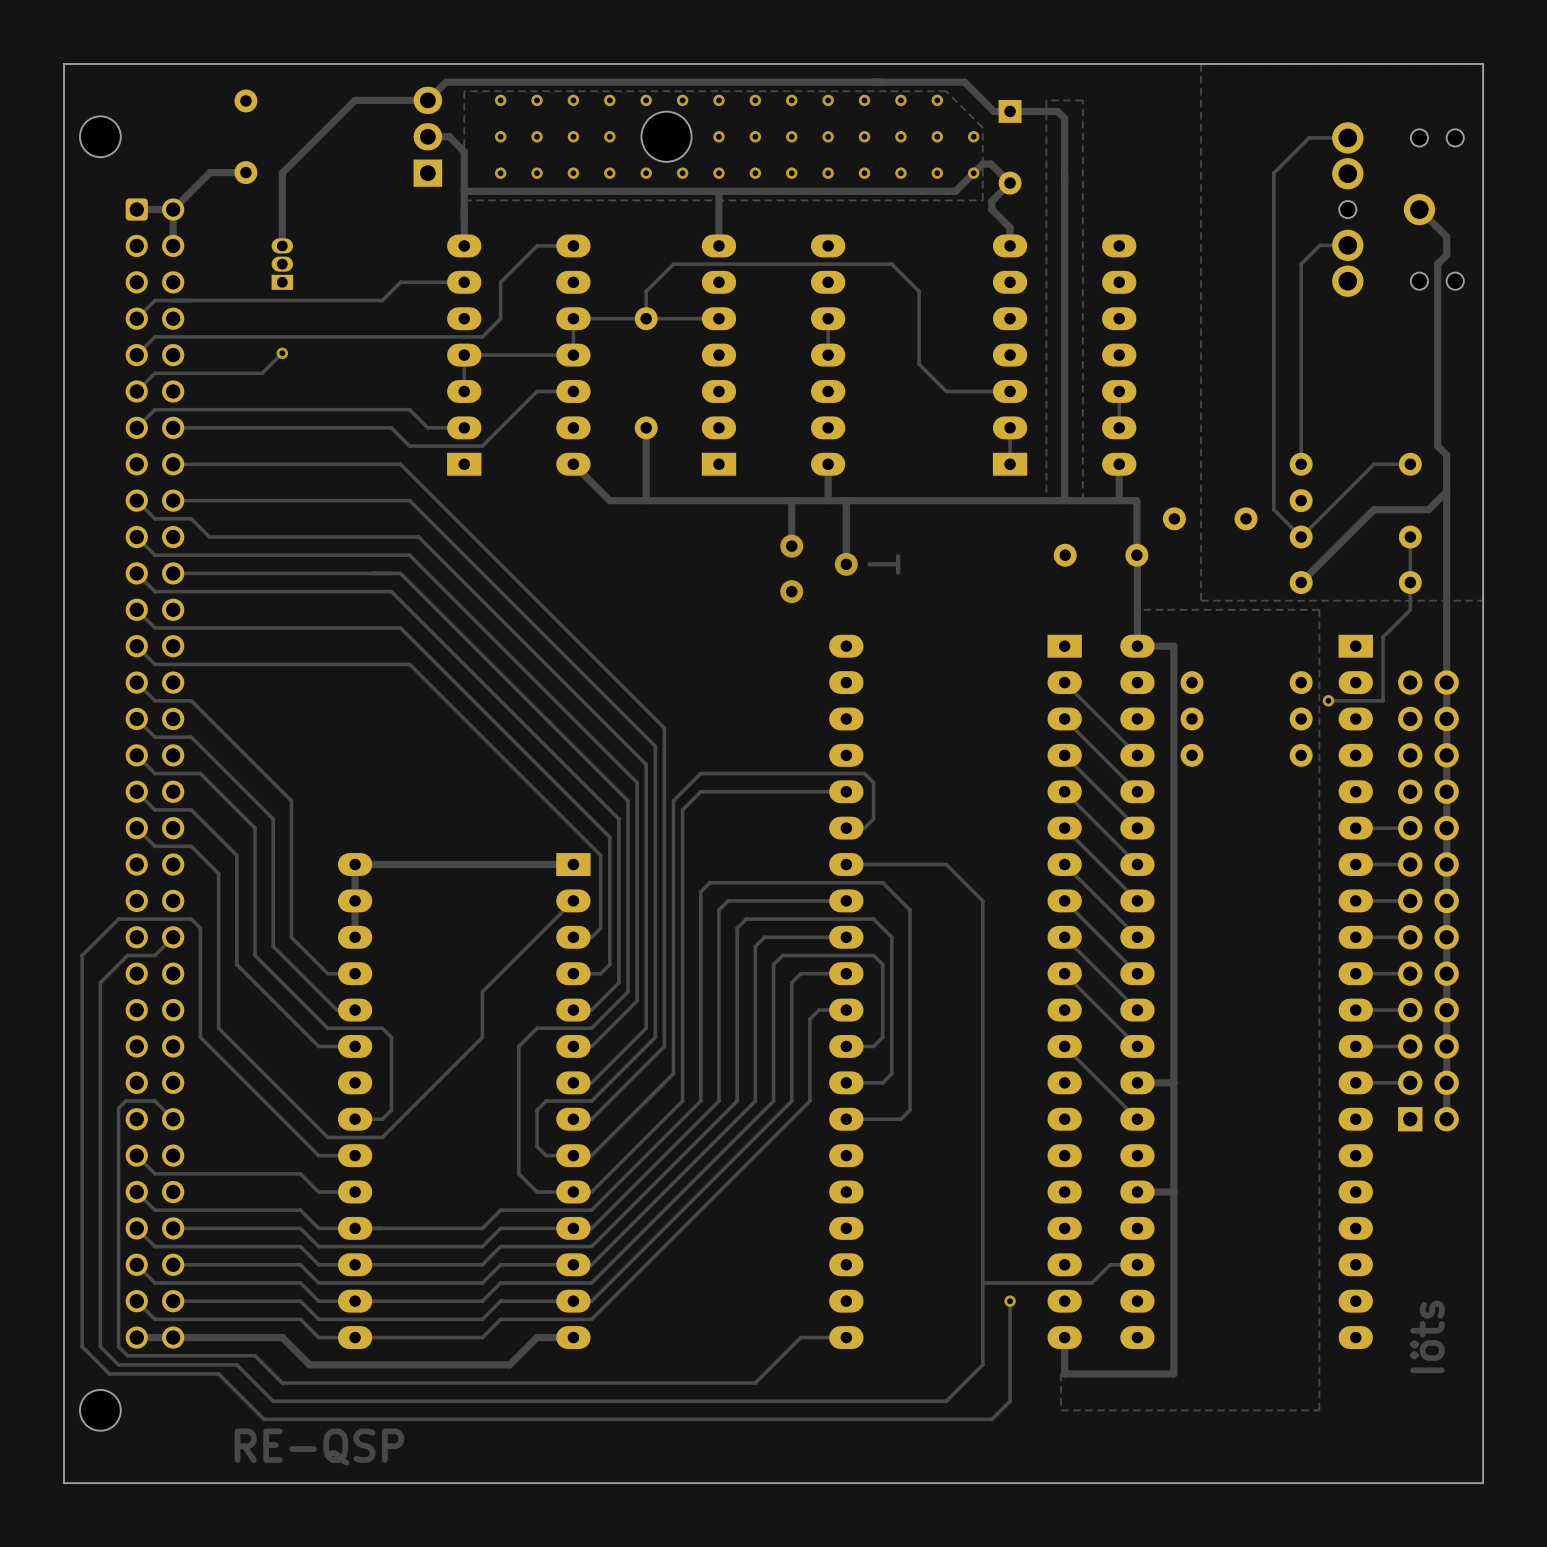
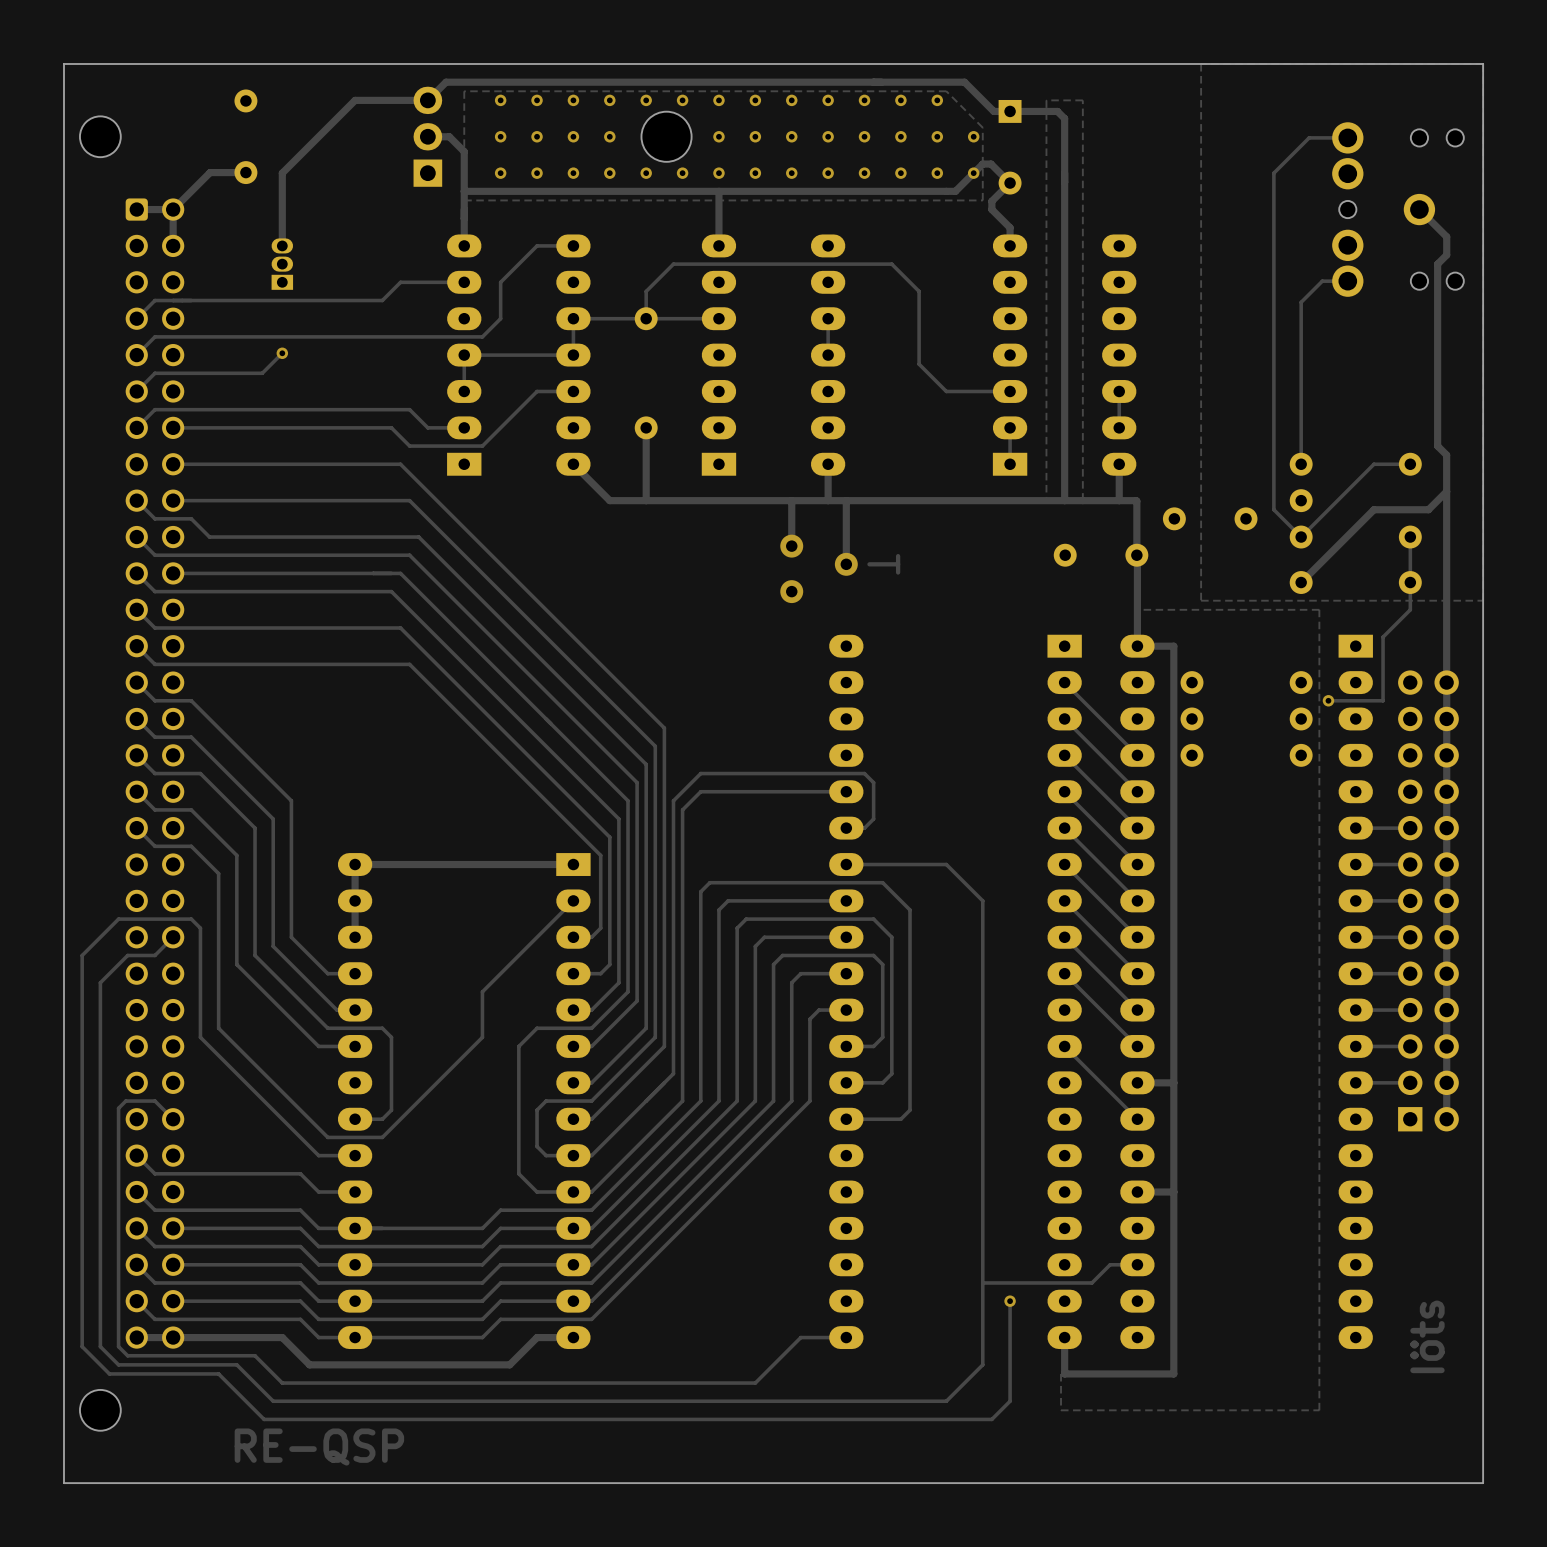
track: (1347, 245) (1319, 245) (1301, 264) (1301, 302) -> (1347, 281) (1322, 281) (1301, 302)

